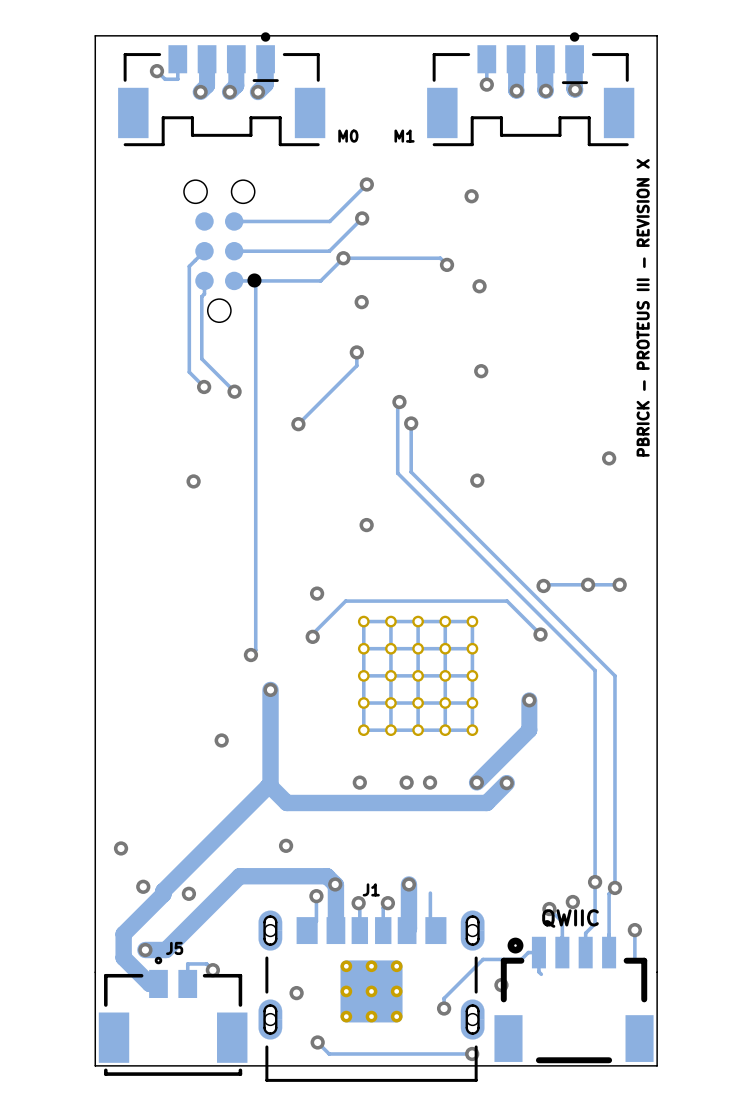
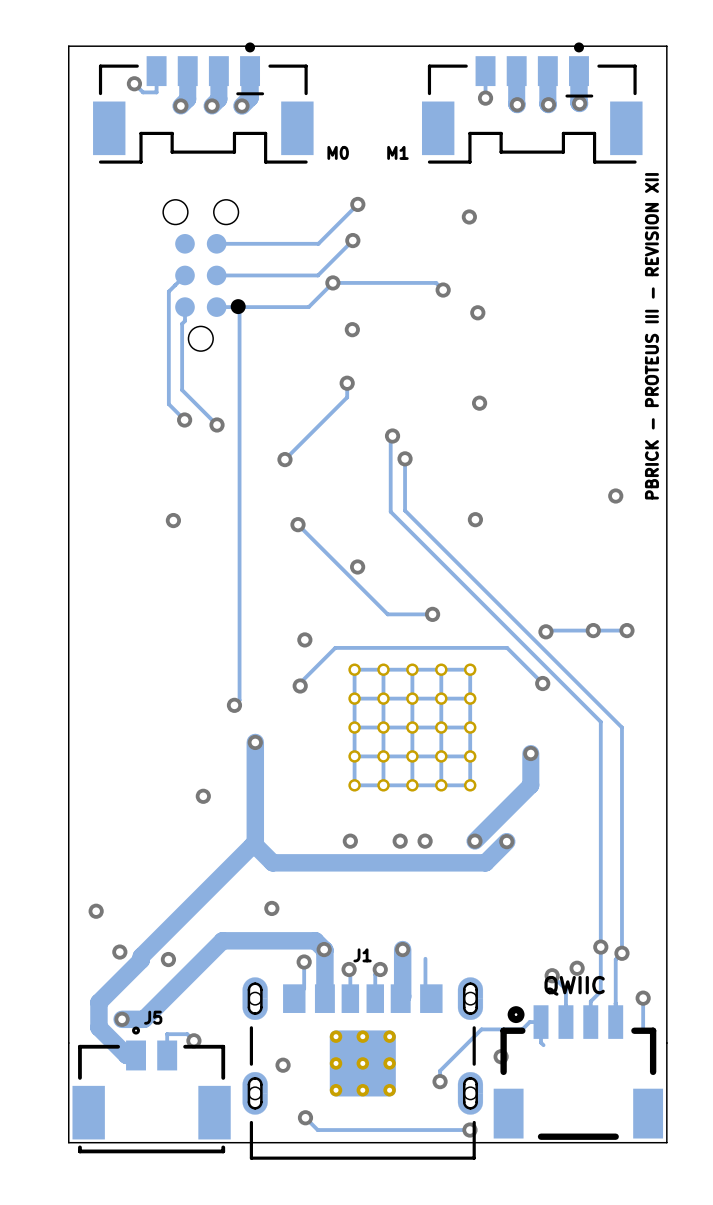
text: PBRICK - PROTEUS III - REVISION X (643, 307) -> PBRICK - PROTEUS III - REVISION XII (651, 336)
track: none -> (298, 524) (387, 614) (432, 614)
via: none -> (298, 524)
via: none -> (432, 614)

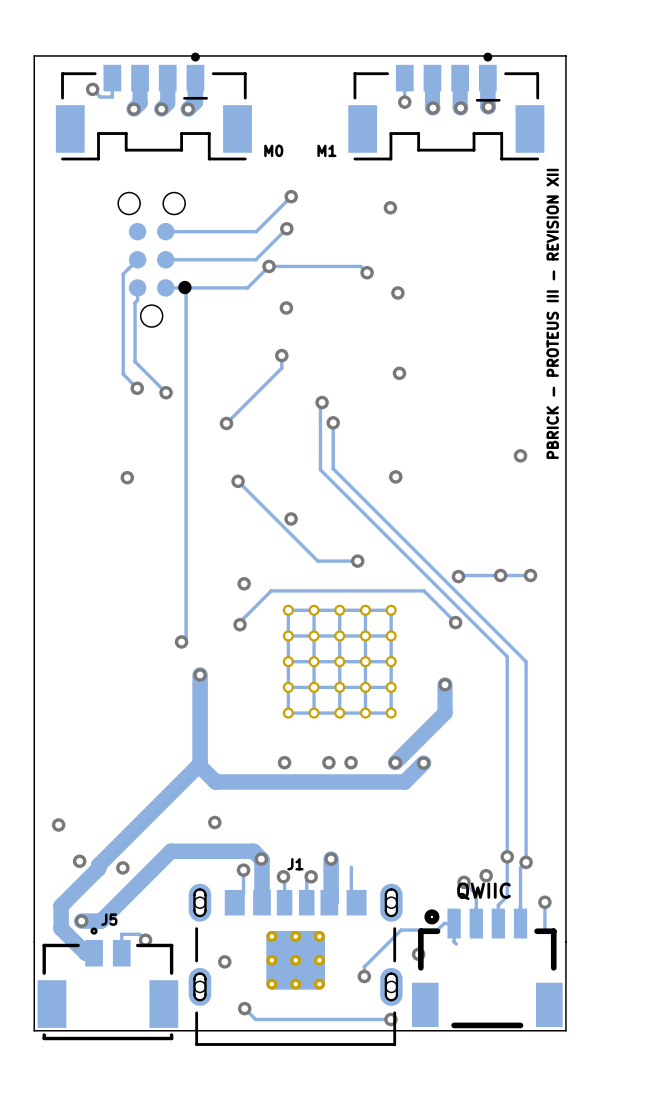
via: (203, 796) -> none

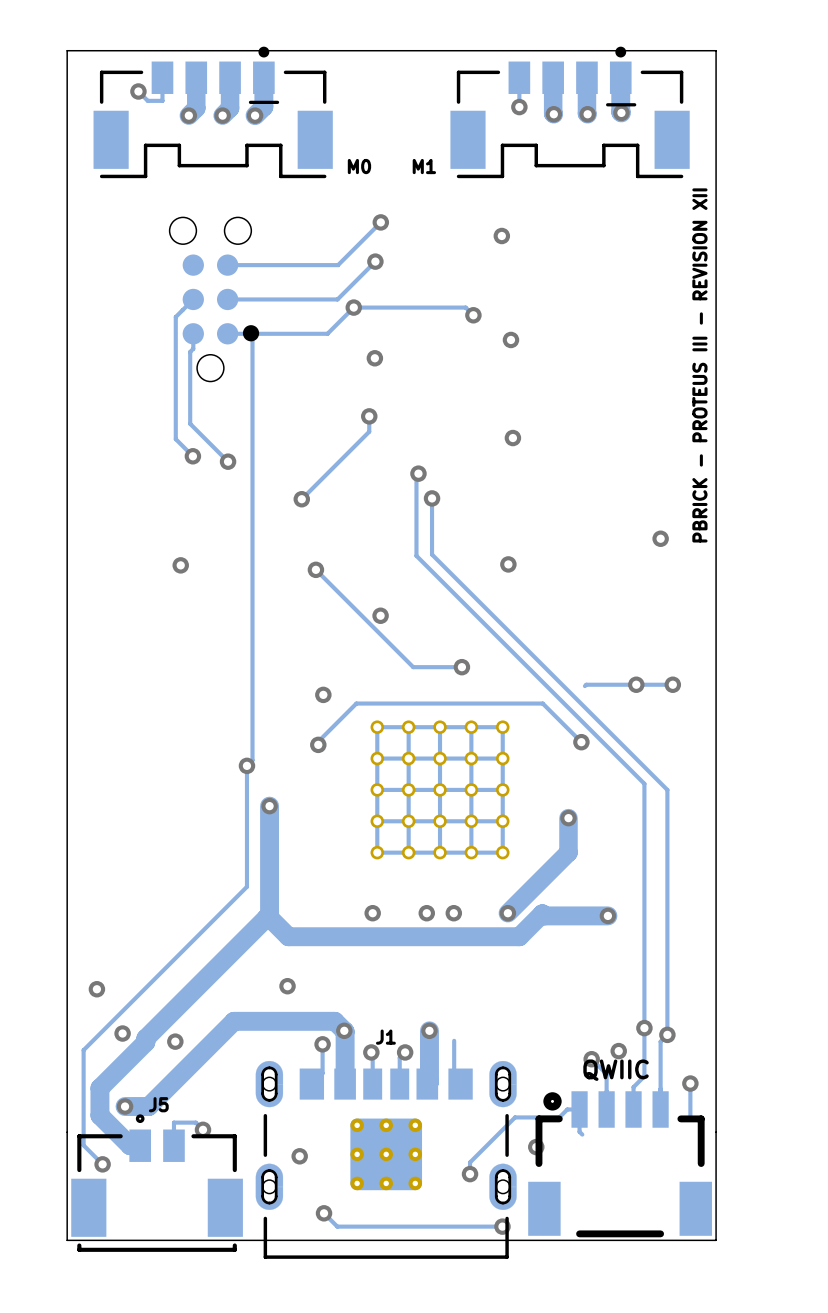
via: (458, 576) -> none
track: none -> (246, 765) (246, 886) (83, 1050) (83, 1145) (102, 1164)
track: none -> (542, 913) (544, 915) (607, 915)
via position: (423, 763) -> (607, 915)
via: none -> (102, 1164)

